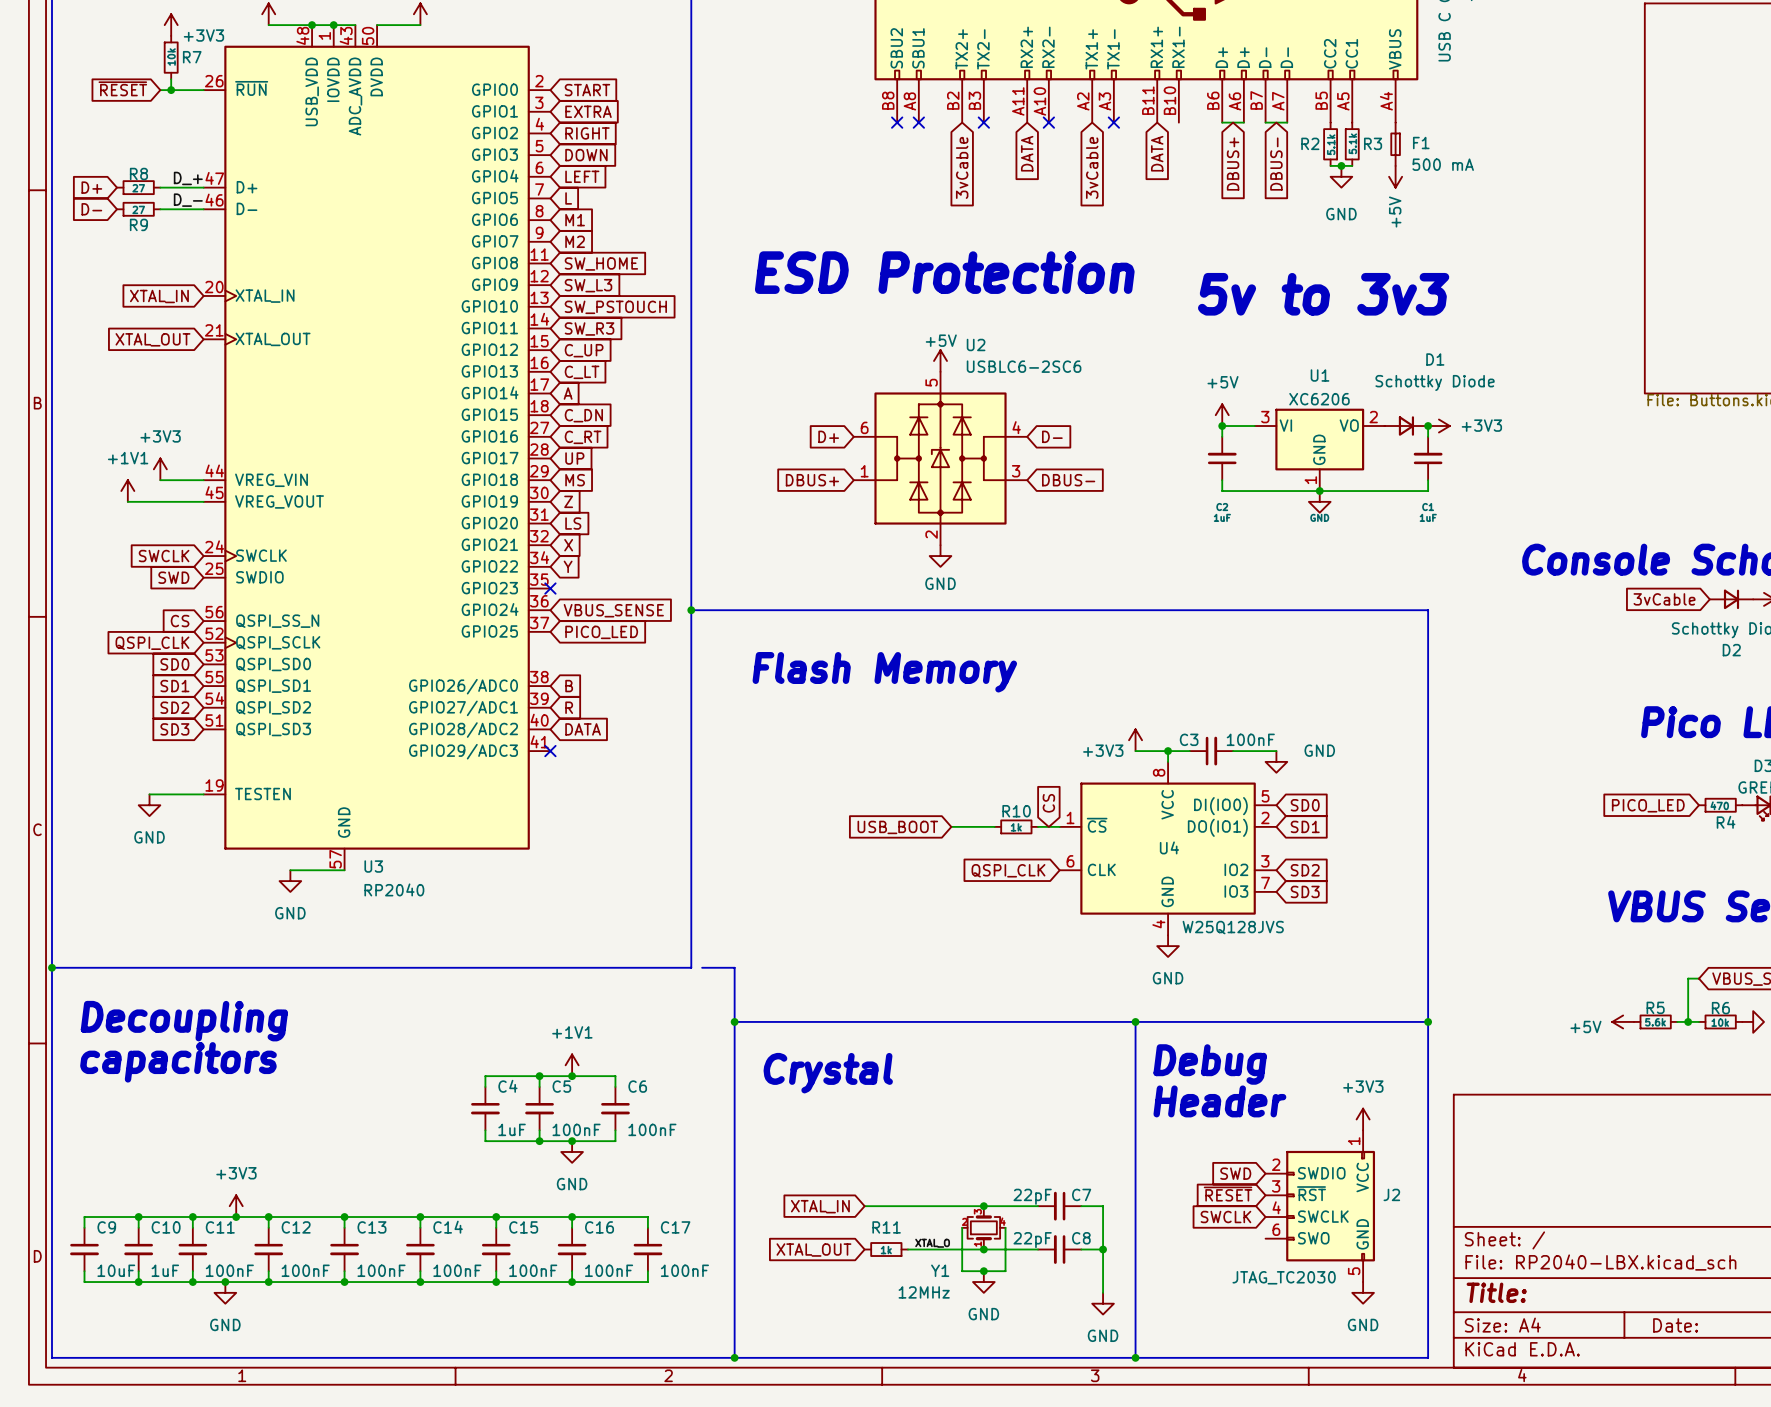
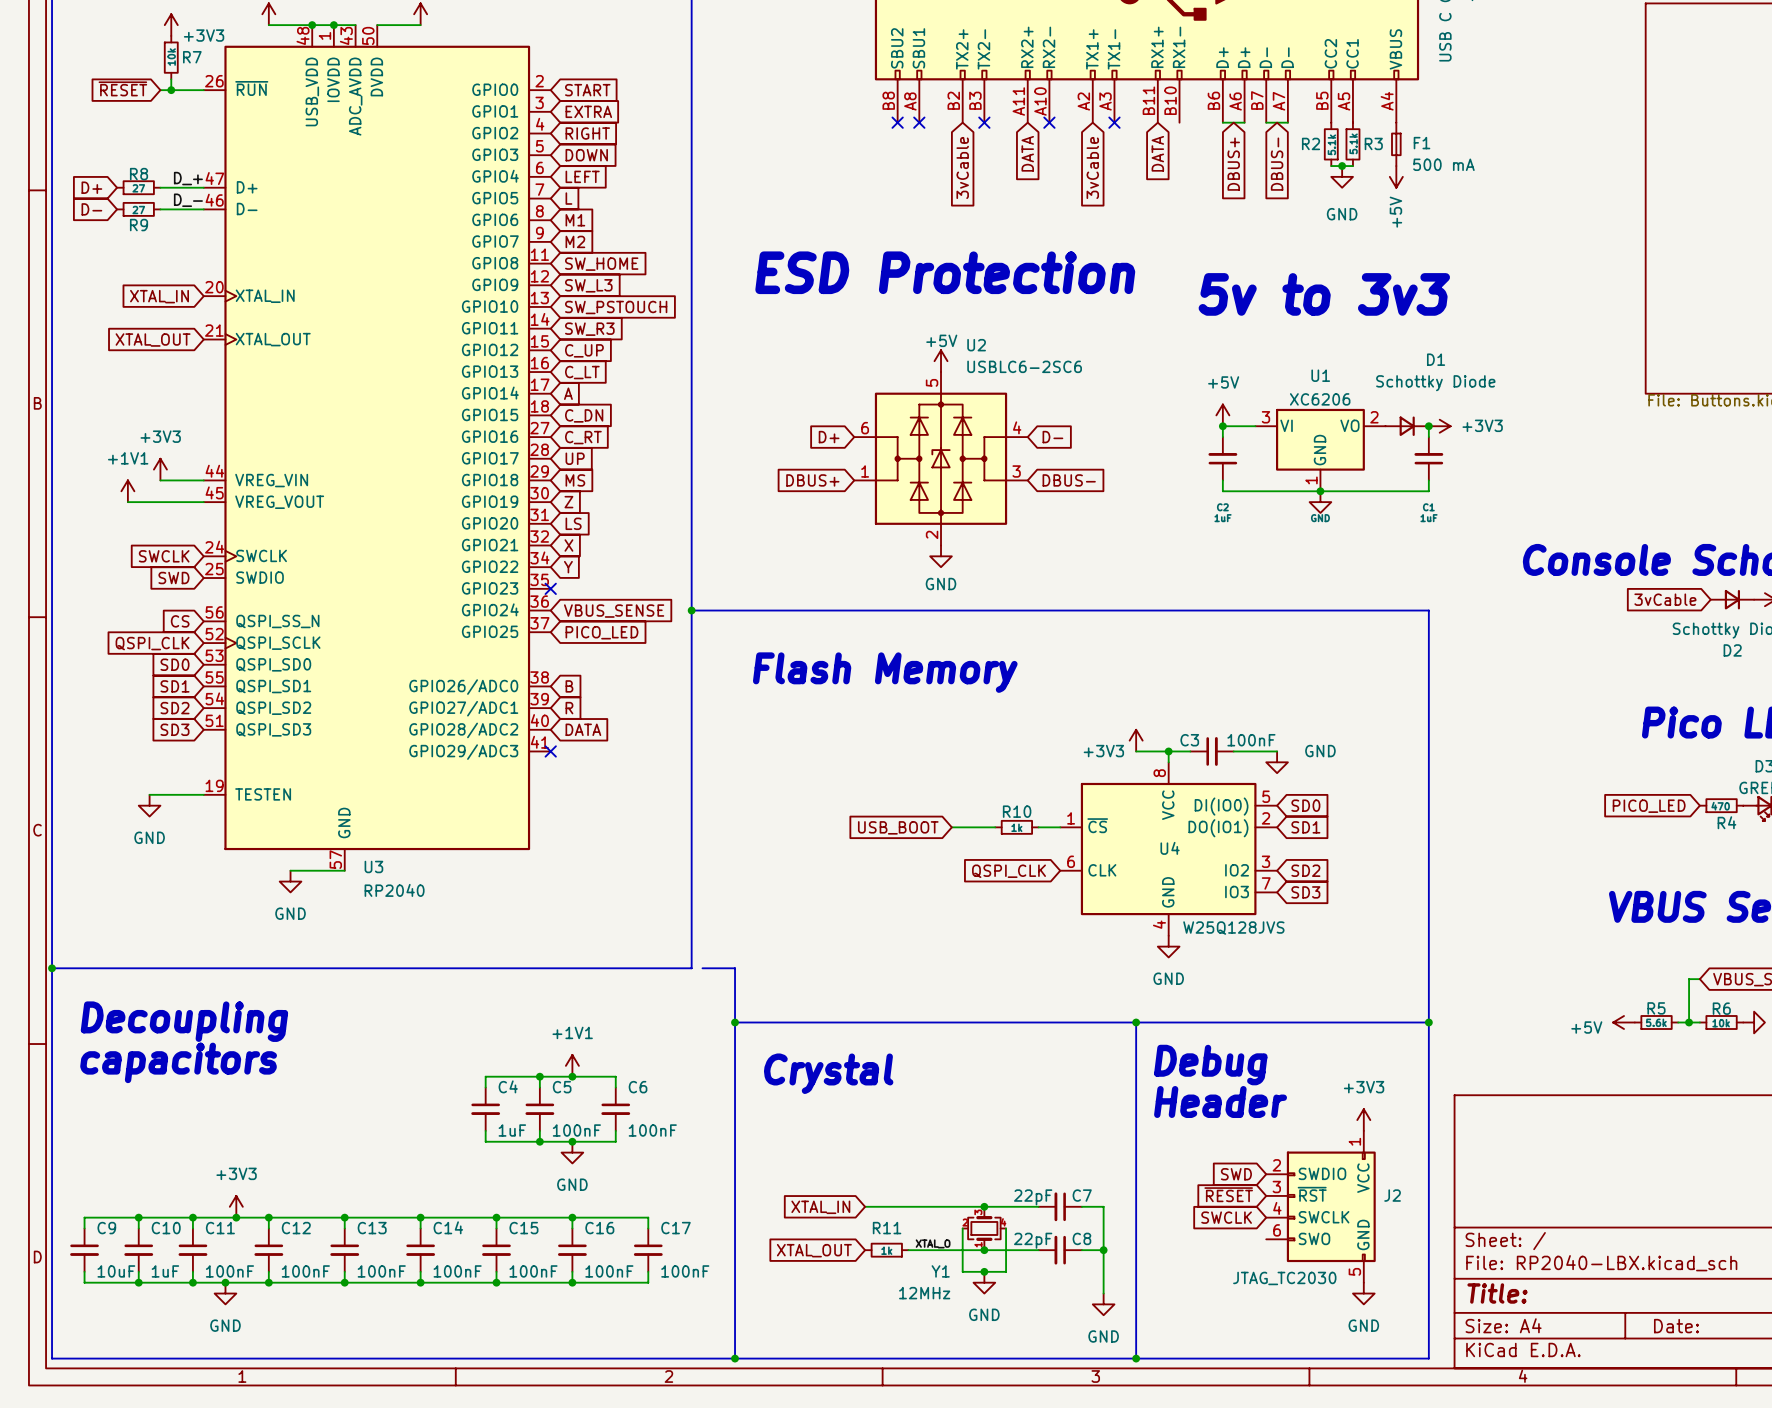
global label: CS (1048, 803) -> none

